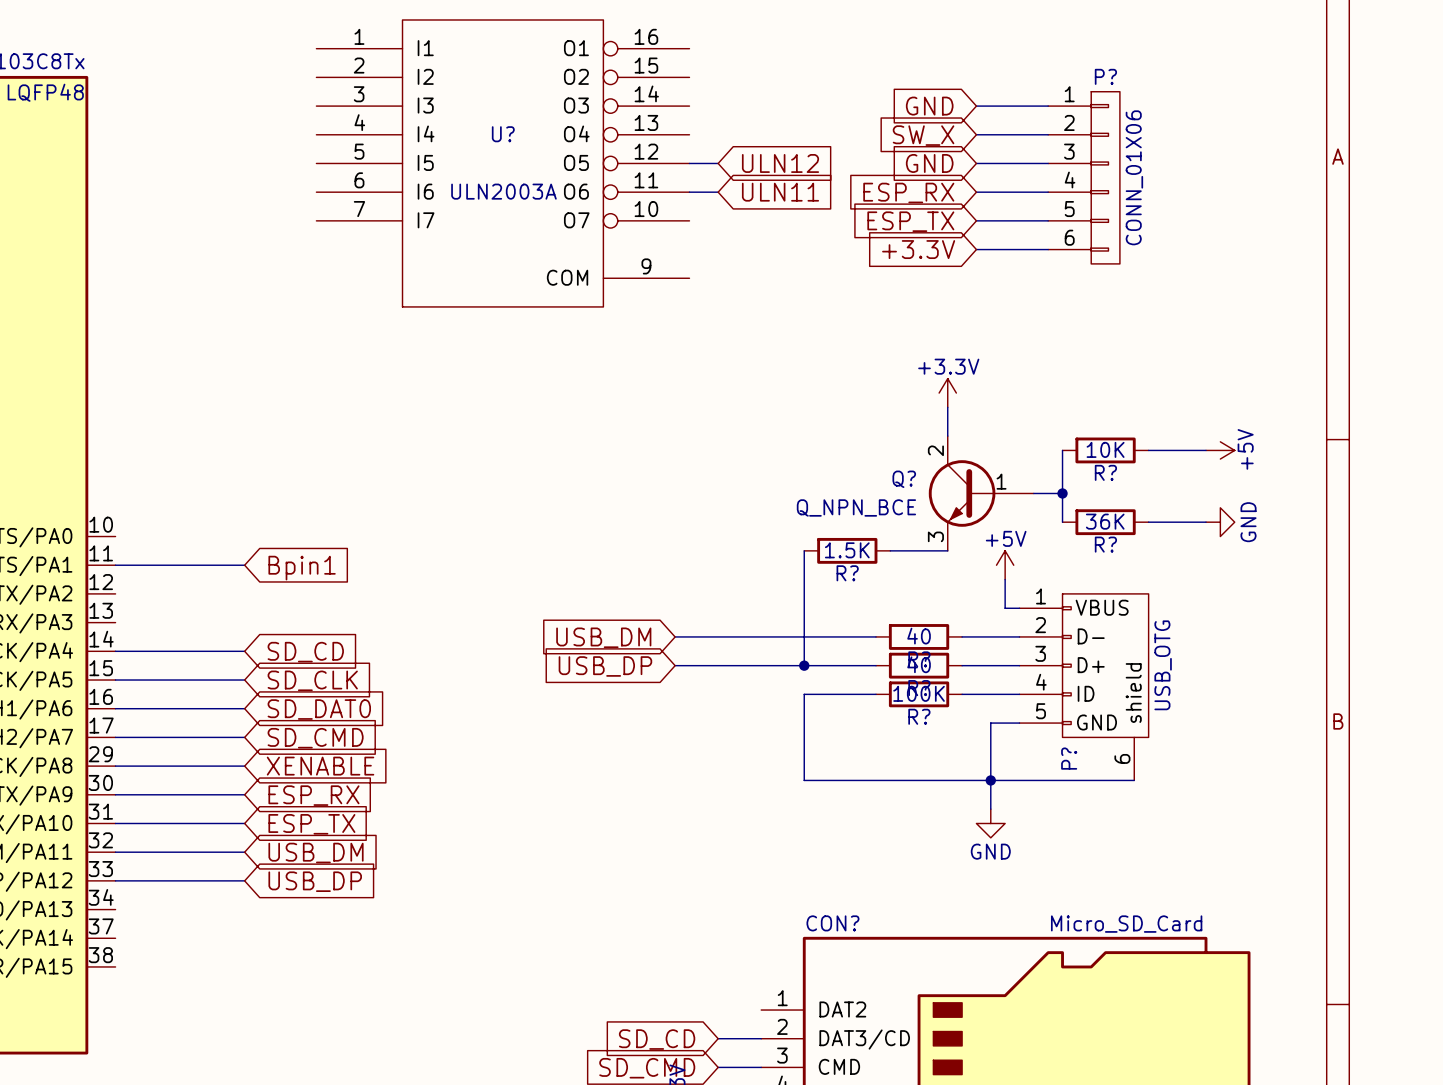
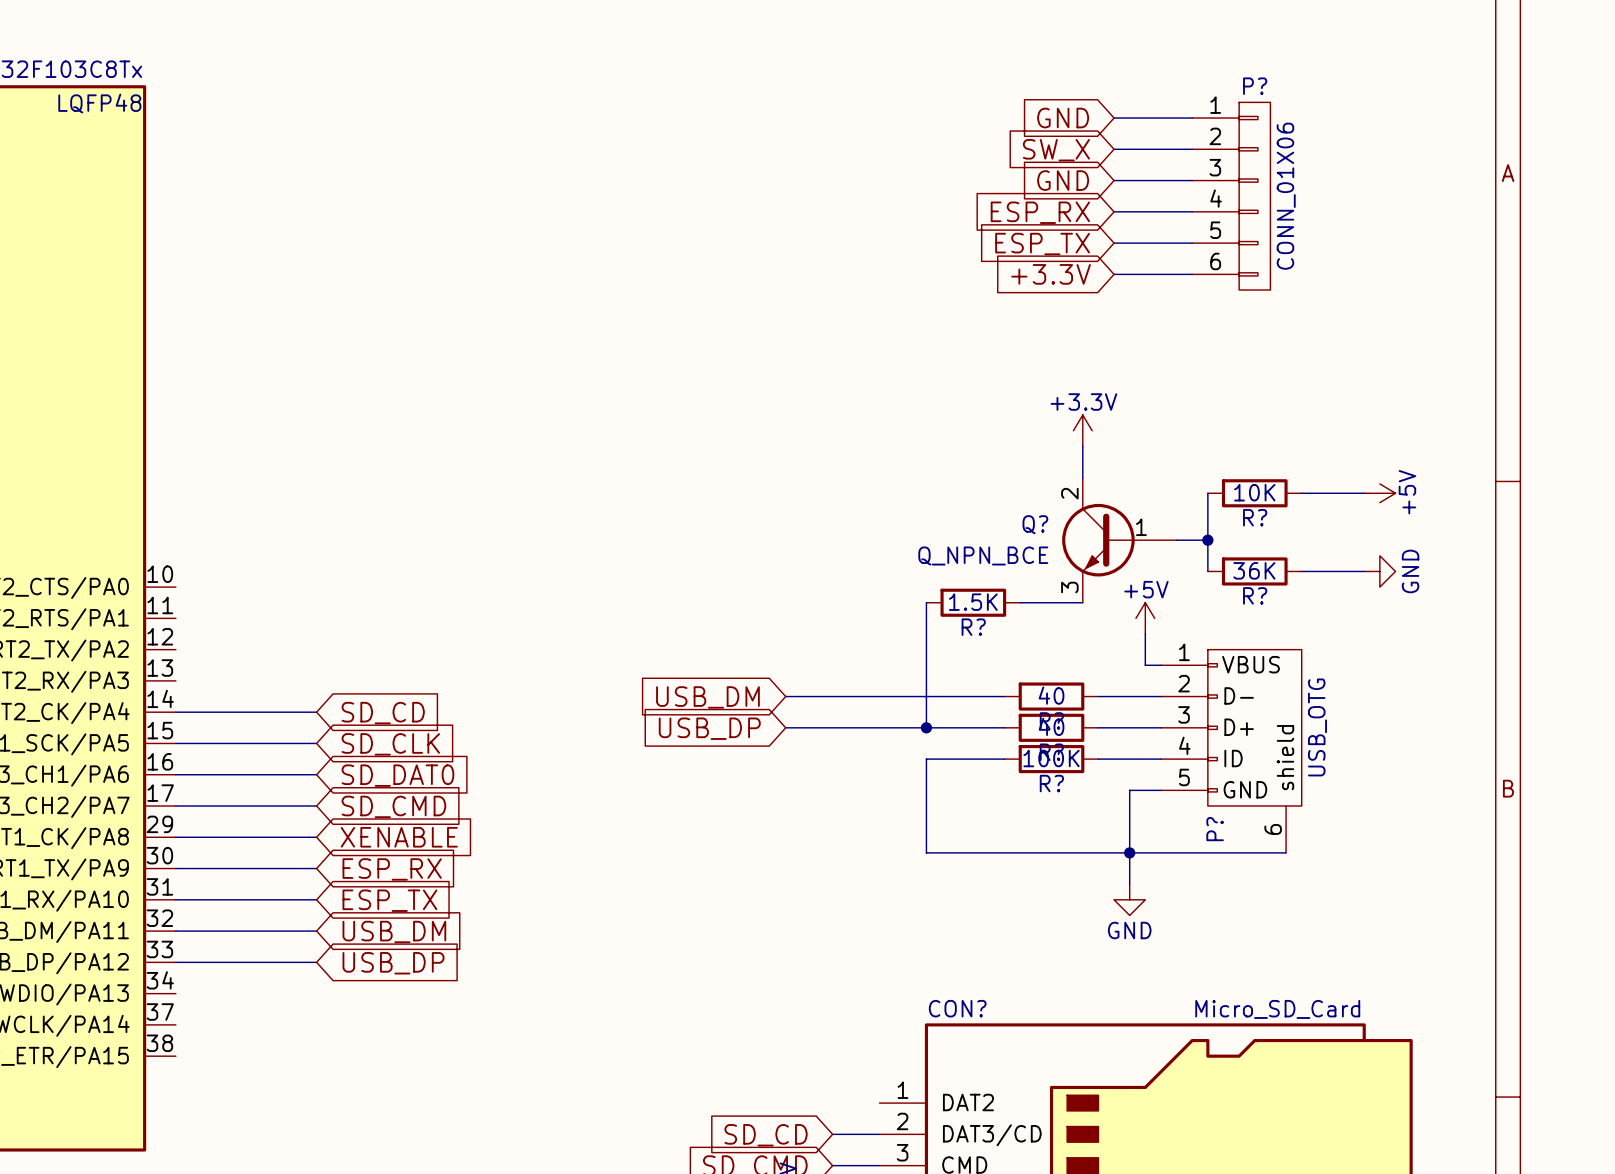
U?: ULN2003A (502, 163) -> none
wire: (689, 163) (718, 163) -> none
global label: ULN12 (780, 163) -> none
wire: (689, 192) (718, 192) -> none
global label: ULN11 (780, 192) -> none
wire: (115, 565) (244, 565) -> none
global label: Bpin1 (302, 568) -> none

